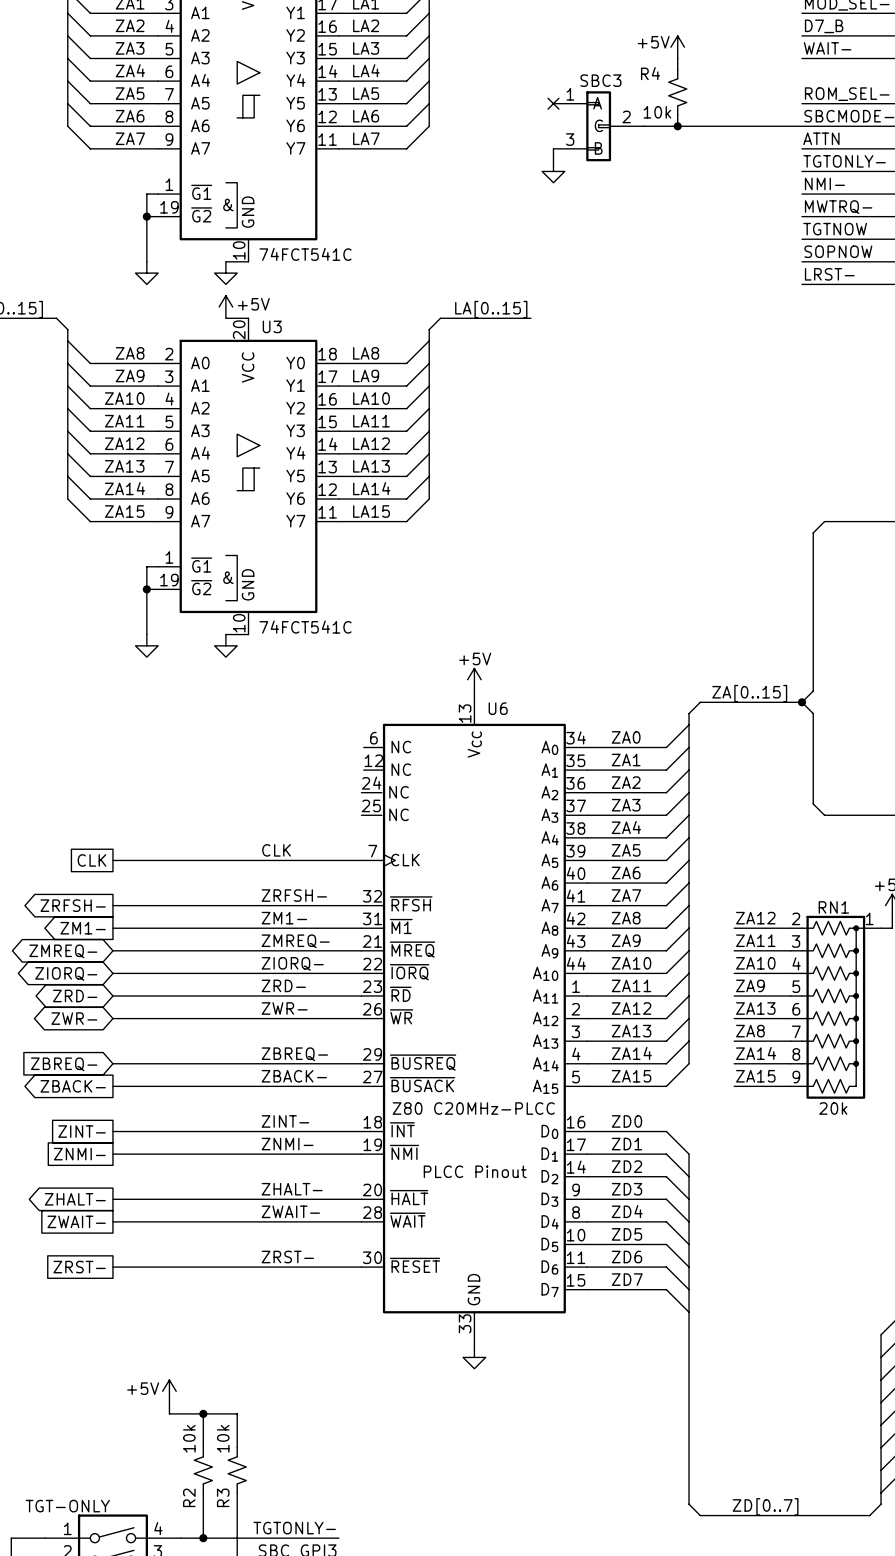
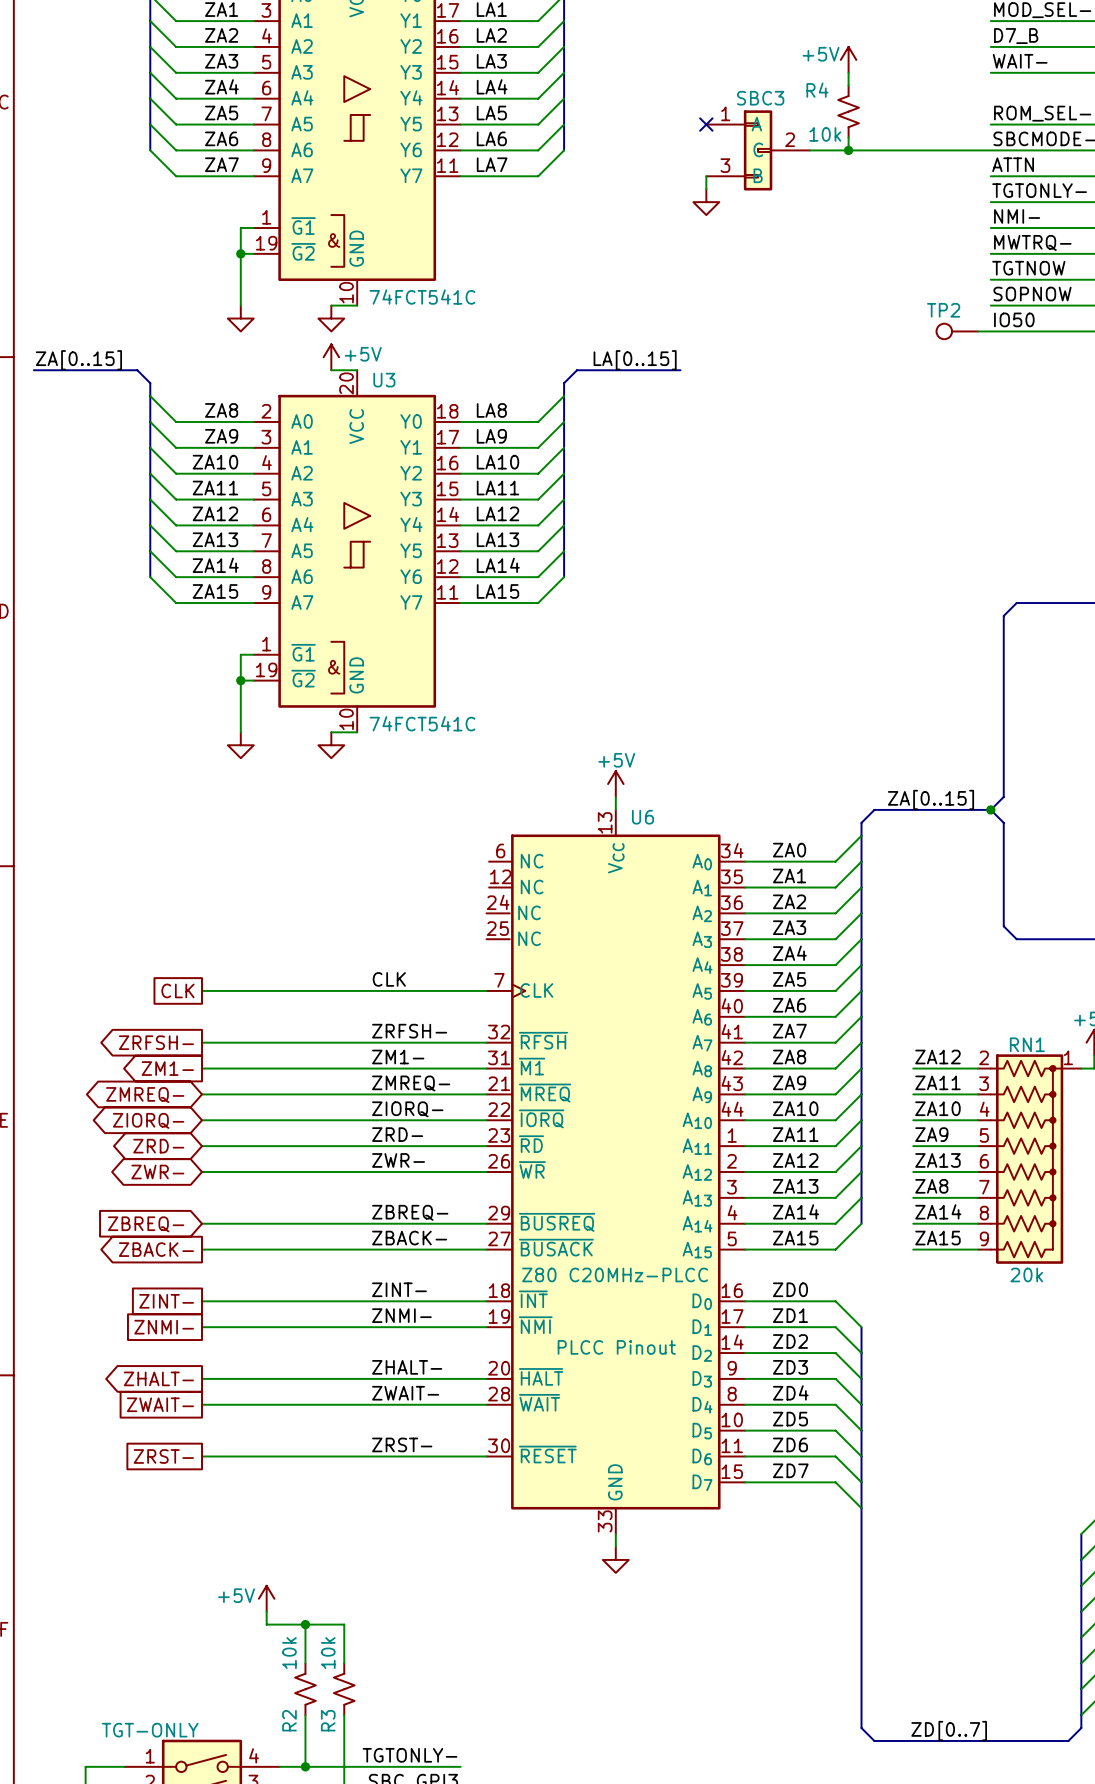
label: LRST- (829, 274) -> IO50 (1014, 319)
TP2: none -> (957, 331)
wire: none -> (977, 331) (990, 331)

